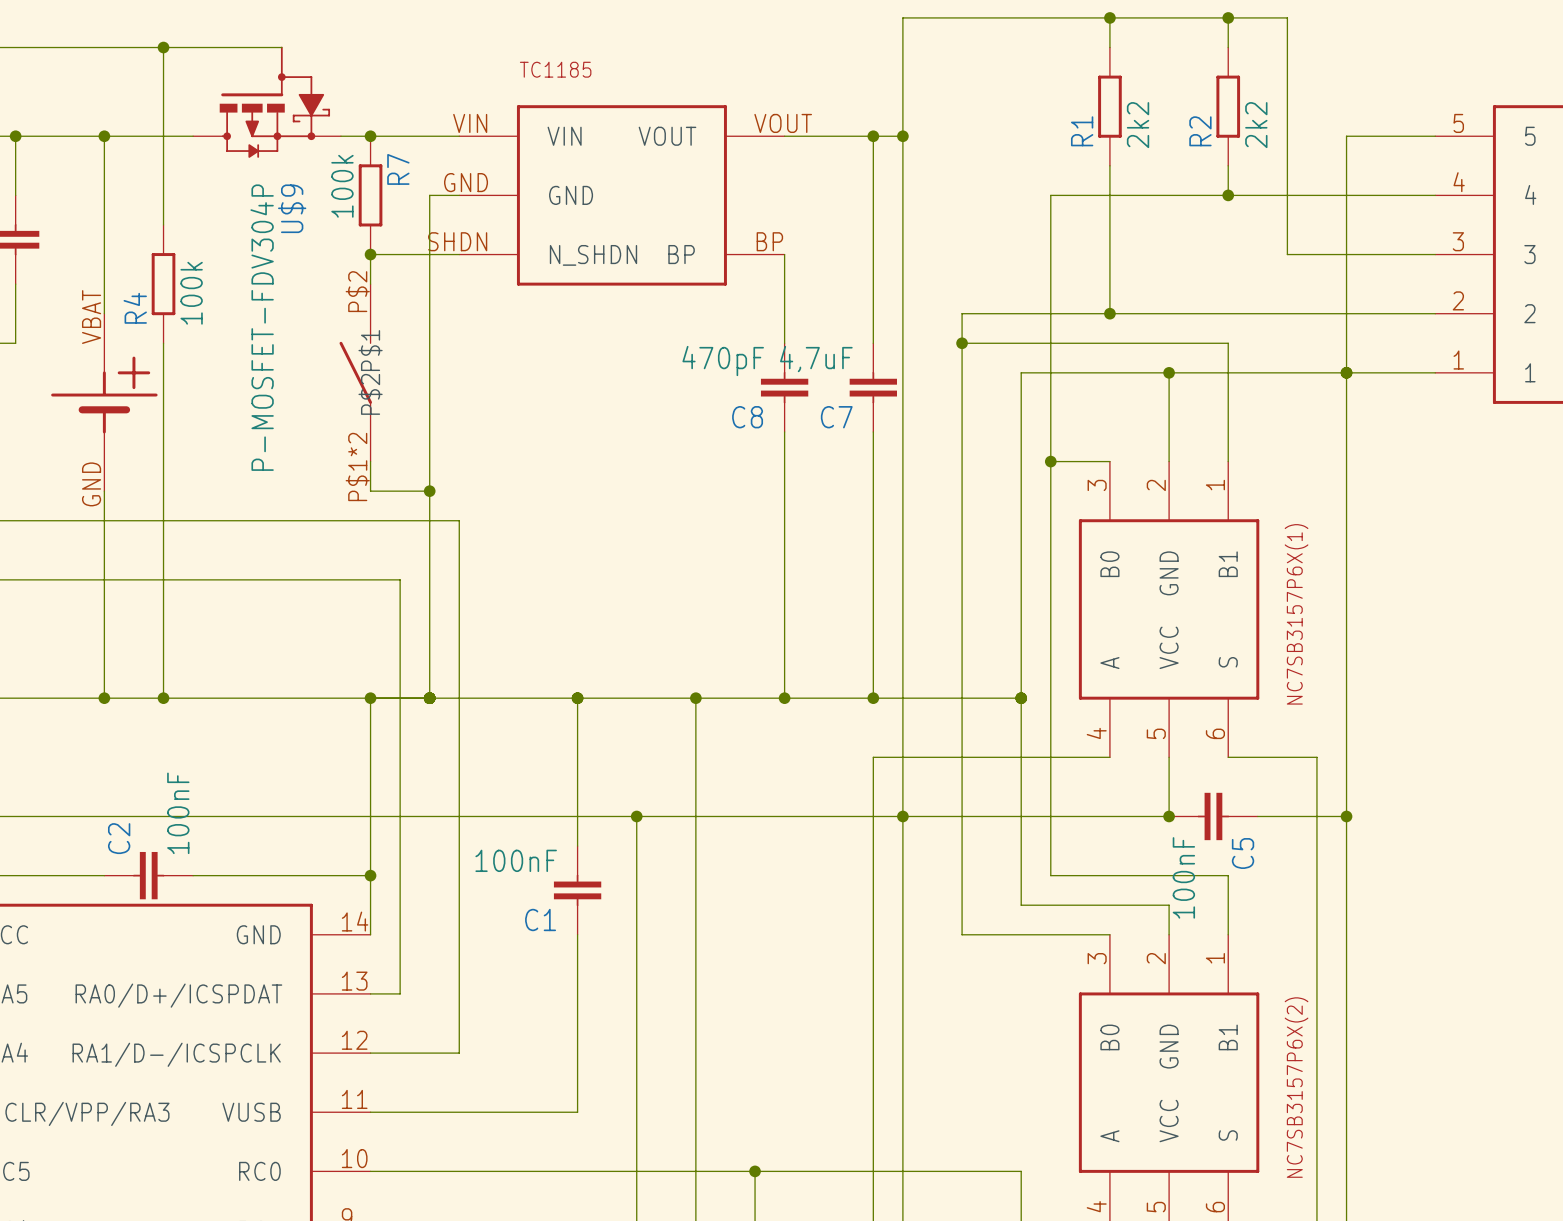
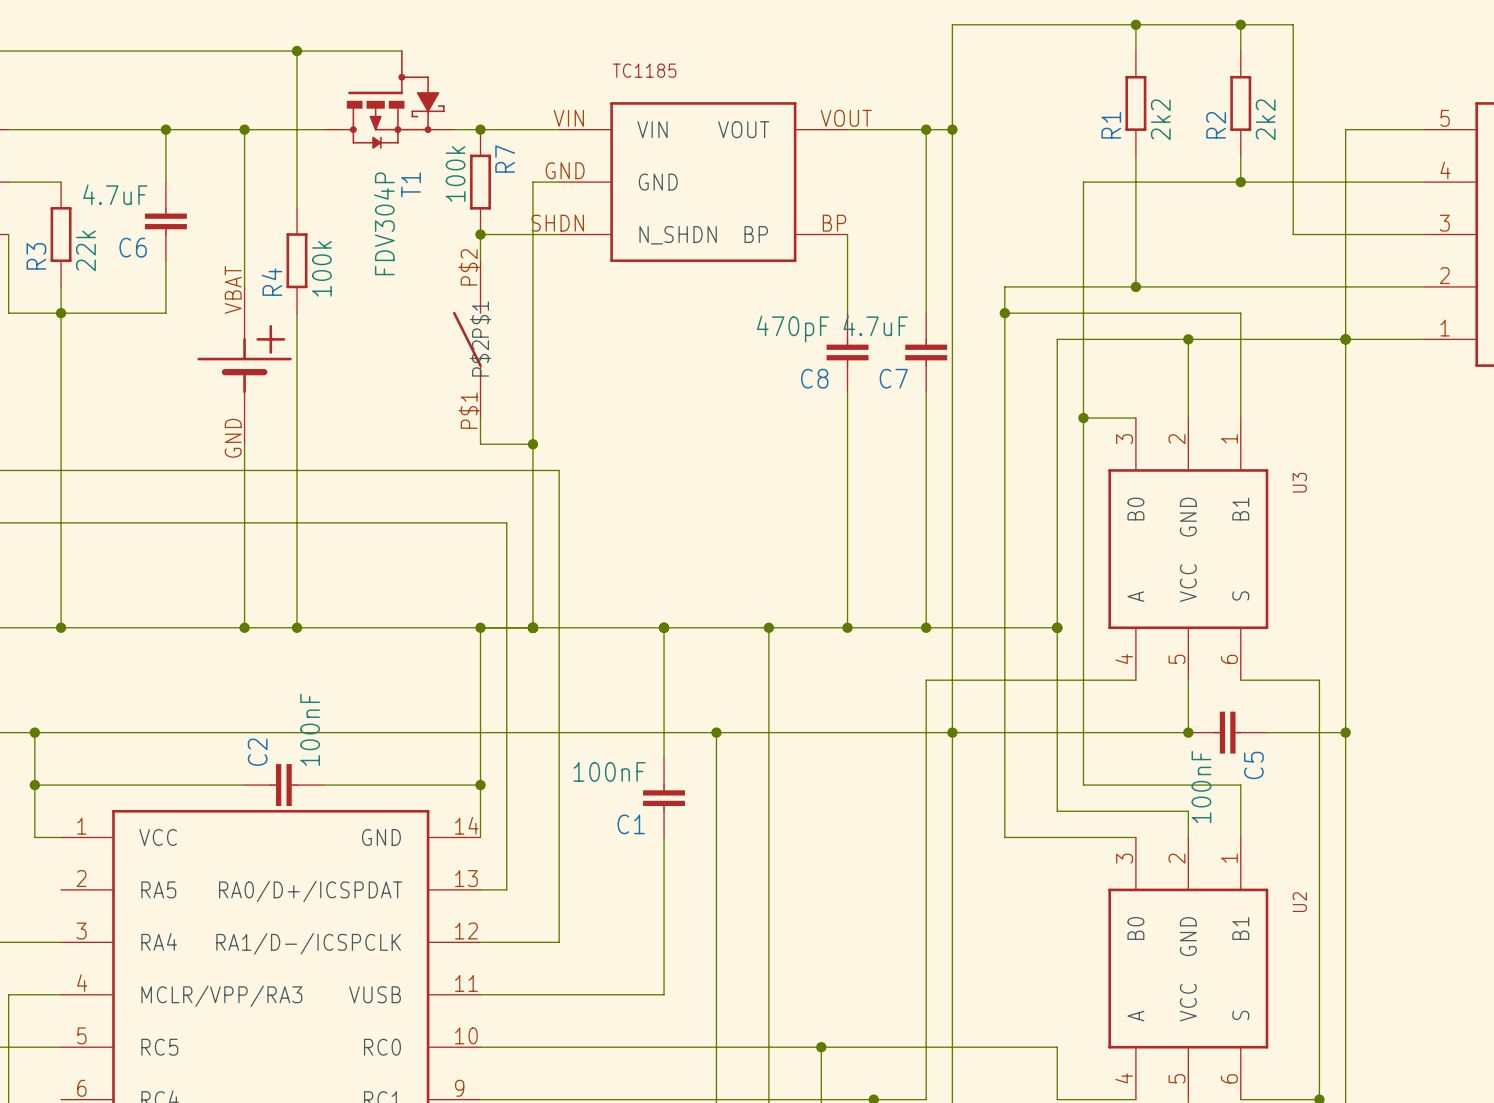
U$9 name: U$9 (292, 208) -> T1 (411, 184)
U$9 value: P-MOSFET-FDV304P (262, 327) -> FDV304P (384, 223)
C7 value: 4,7uF (816, 359) -> 4.7uF (875, 325)
part pin number: P$1*2 (357, 466) -> P$1 (469, 410)
NC7SB3157P6X(1) name: NC7SB3157P6X(1) (1296, 614) -> U3 (1299, 482)
NC7SB3157P6X(2) name: NC7SB3157P6X(2) (1296, 1087) -> U2 (1299, 902)

